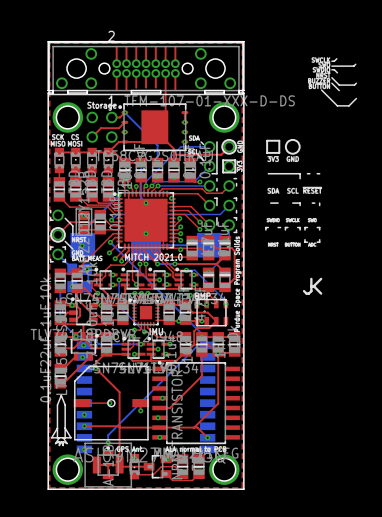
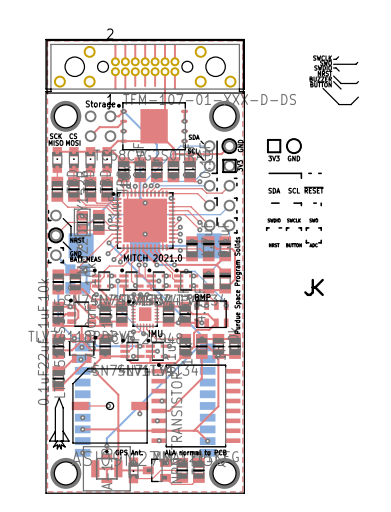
board edge: (67, 90) (87, 90) (87, 93) (67, 93) (67, 90) -> none
board edge: (131, 90) (160, 90) (160, 93) (131, 93) (131, 90) -> none
board edge: (204, 90) (224, 90) (224, 93) (204, 93) (204, 90) -> none

